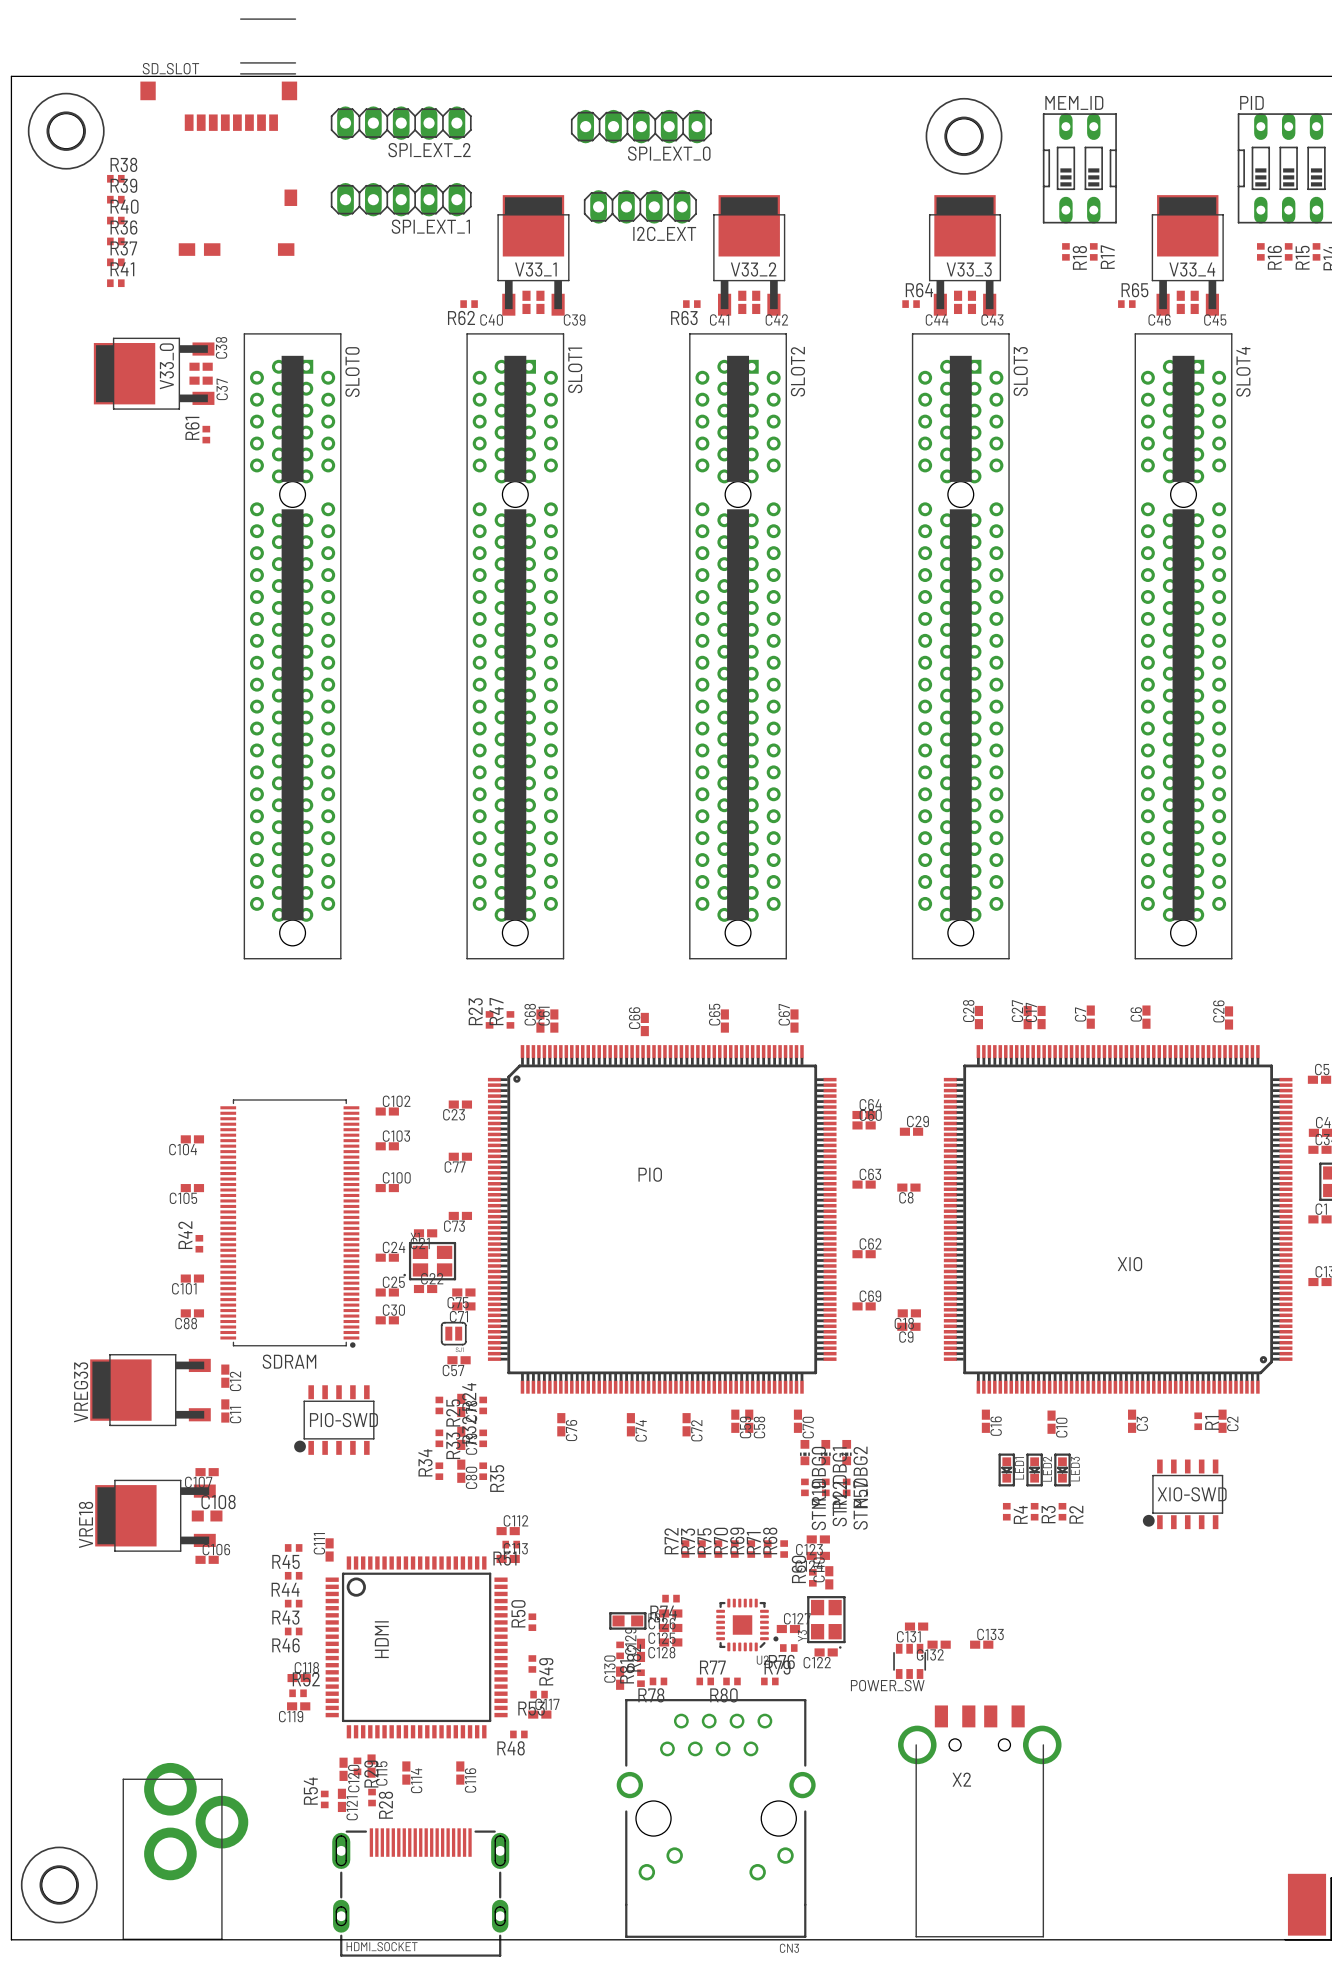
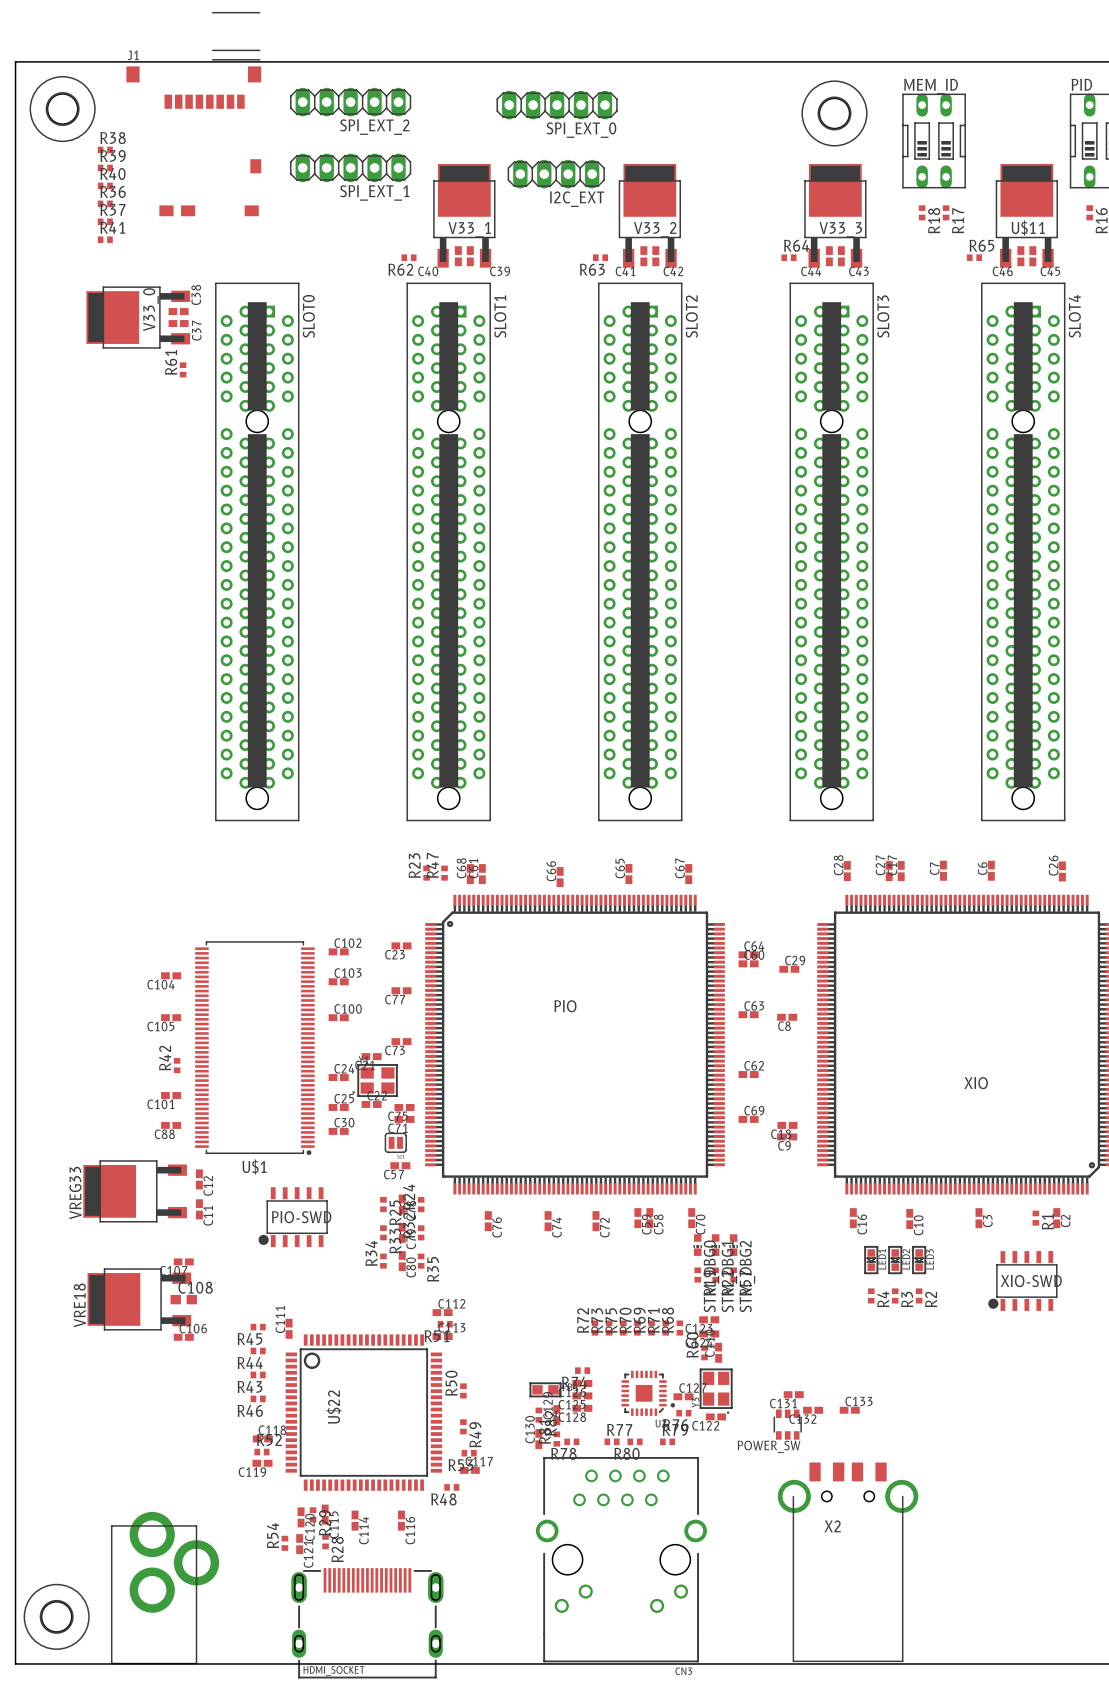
SD_SLOT name: SD_SLOT (170, 68) -> J1 (133, 55)
V33_4 name: V33_4 (1192, 269) -> U$11 (1028, 227)
SDRAM name: SDRAM (289, 1361) -> U$1 (254, 1166)
HDMI name: HDMI (381, 1639) -> U$22 (333, 1407)

